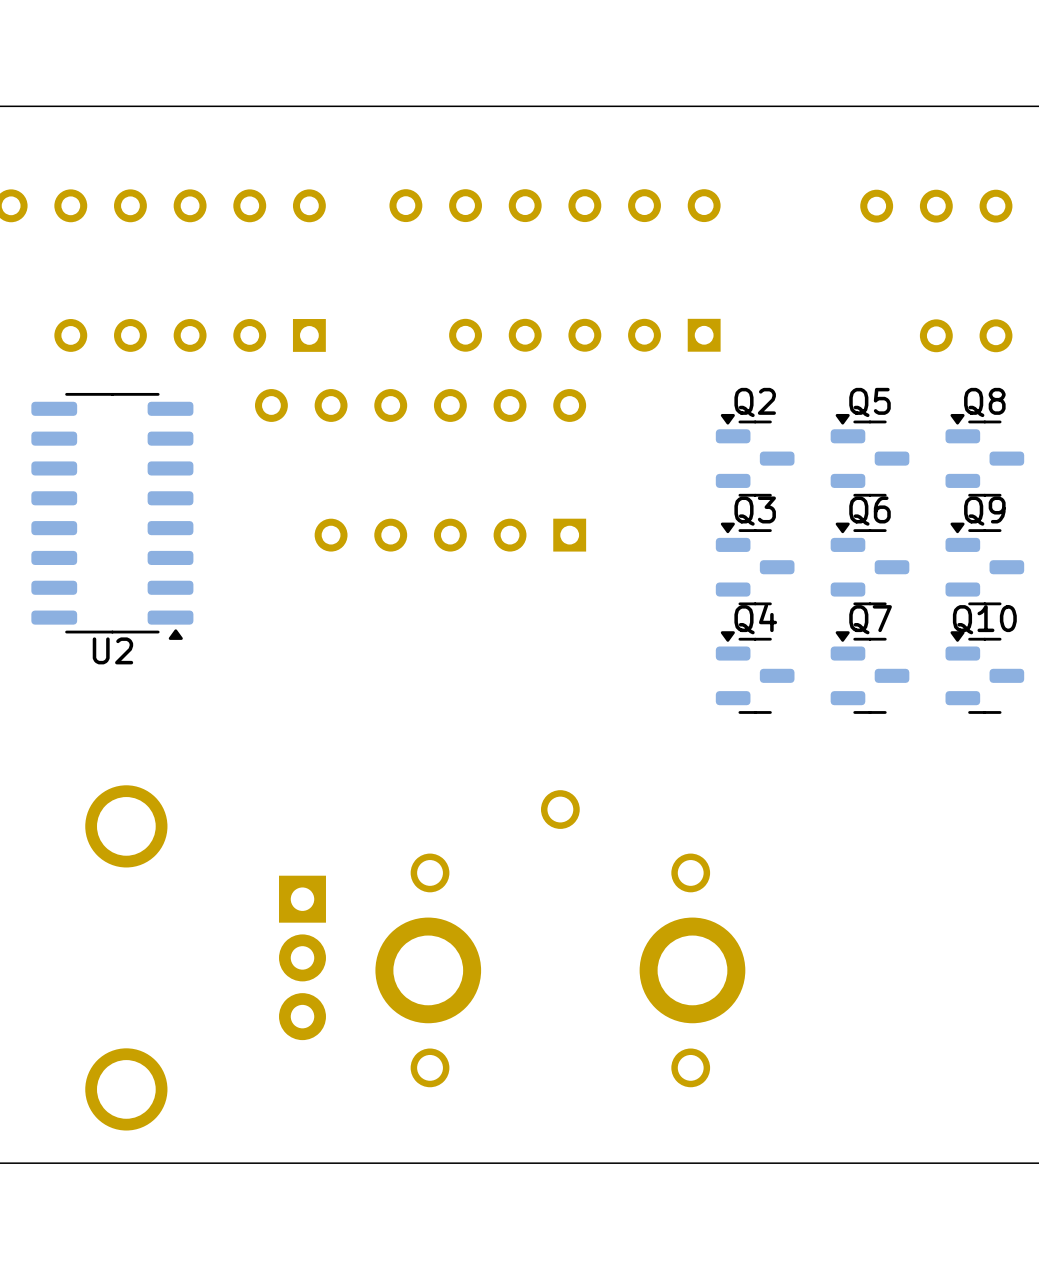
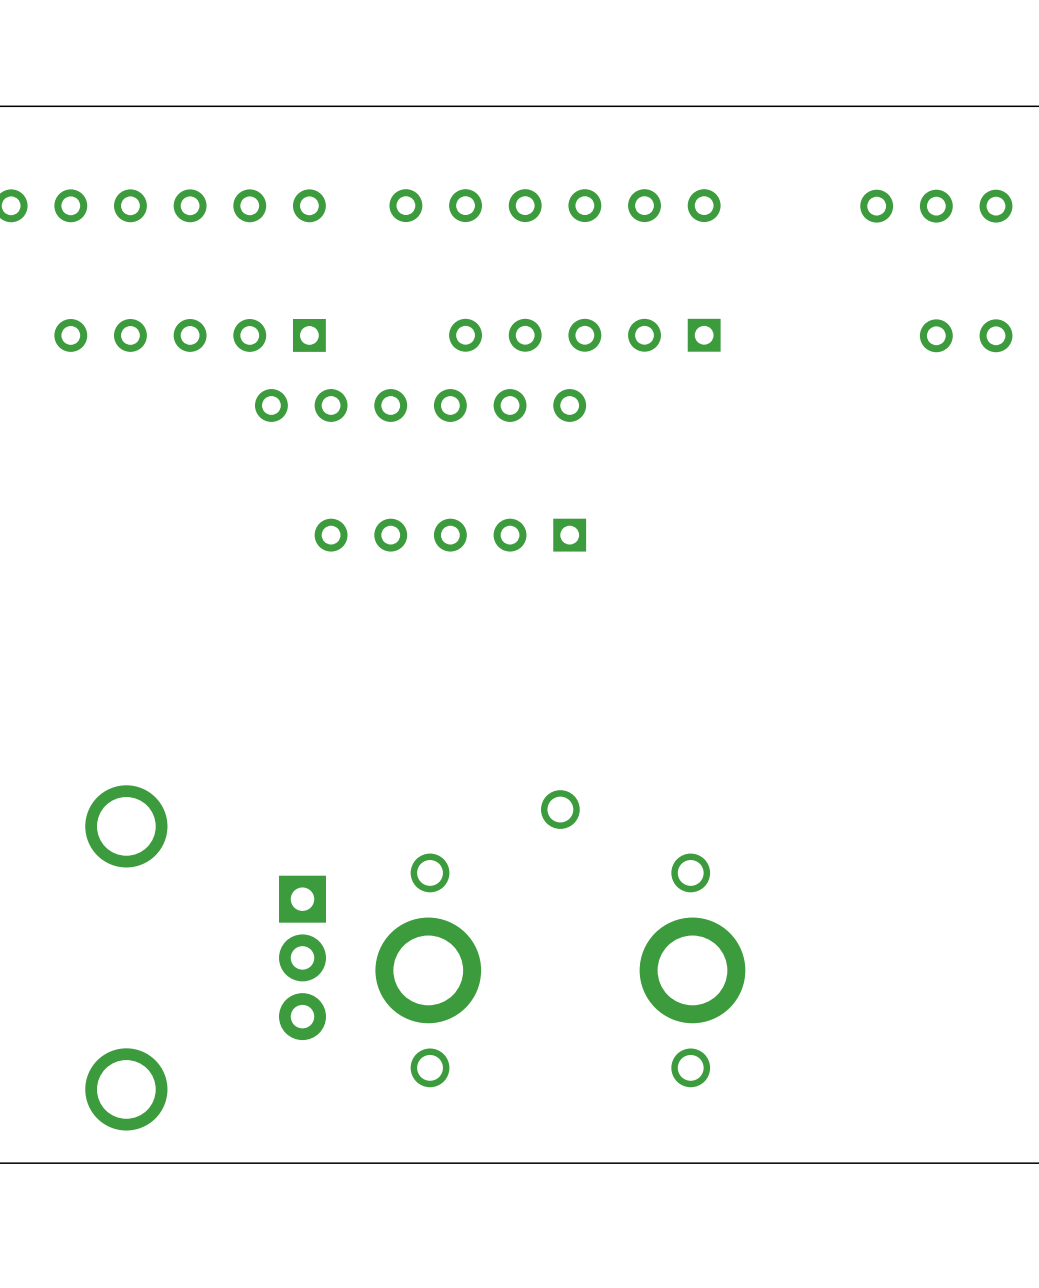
Q2: (755, 455) -> none
Q5: (870, 455) -> none
Q8: (984, 455) -> none
U2: (112, 516) -> none
Q3: (755, 563) -> none
Q6: (870, 563) -> none
Q9: (984, 563) -> none
Q4: (755, 672) -> none
Q7: (870, 672) -> none
Q10: (984, 672) -> none

